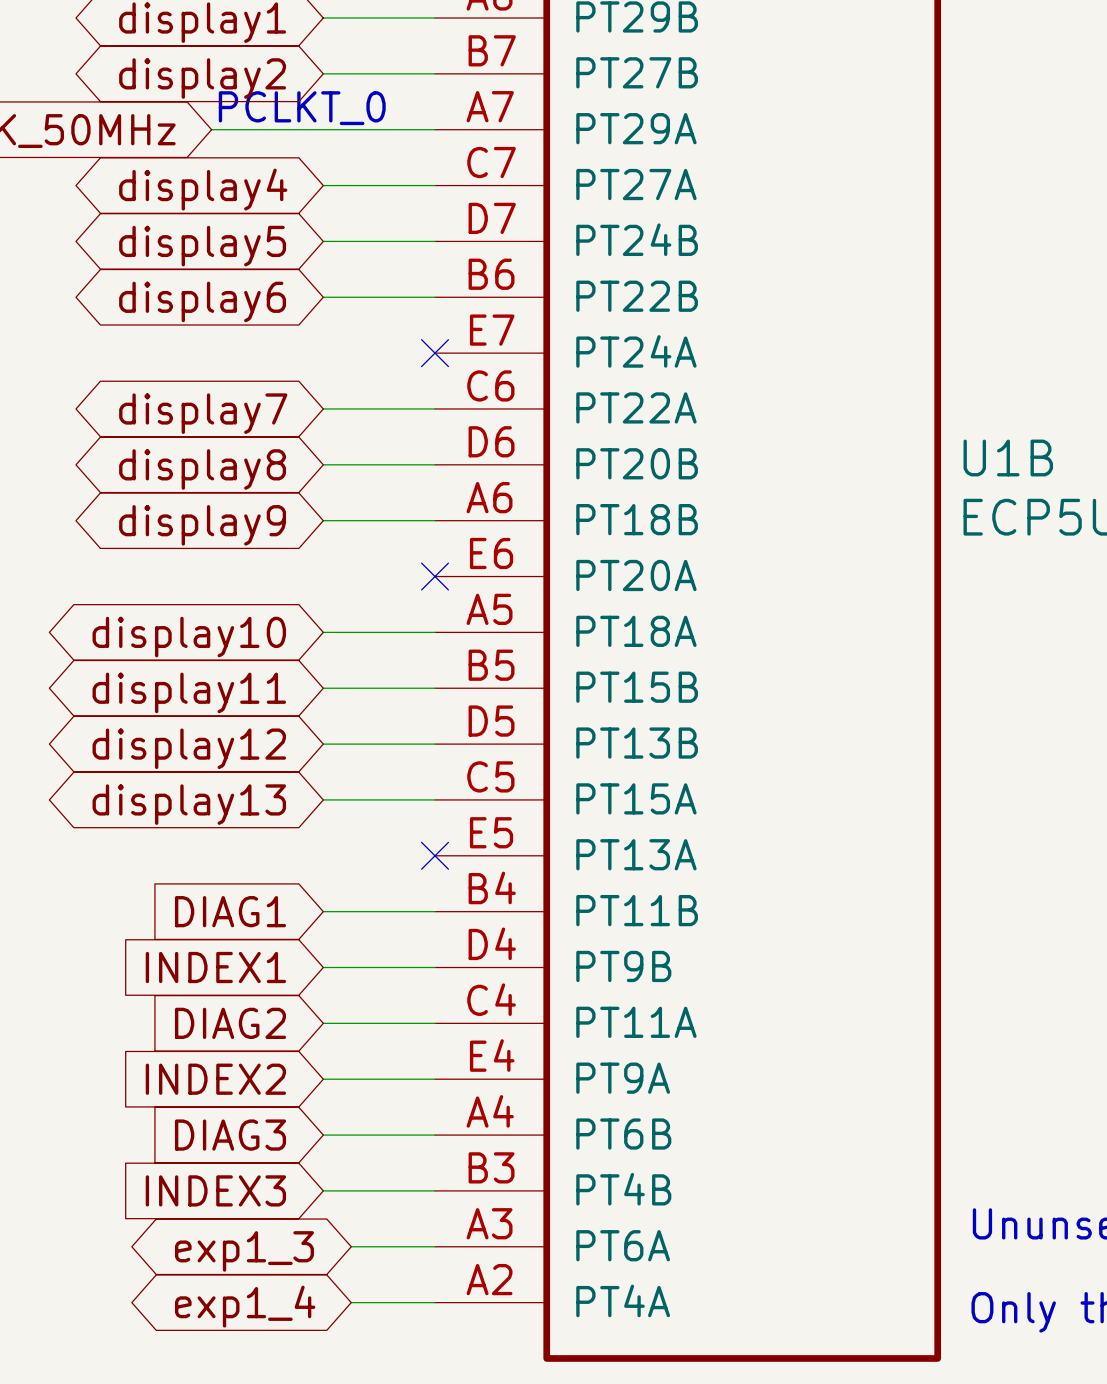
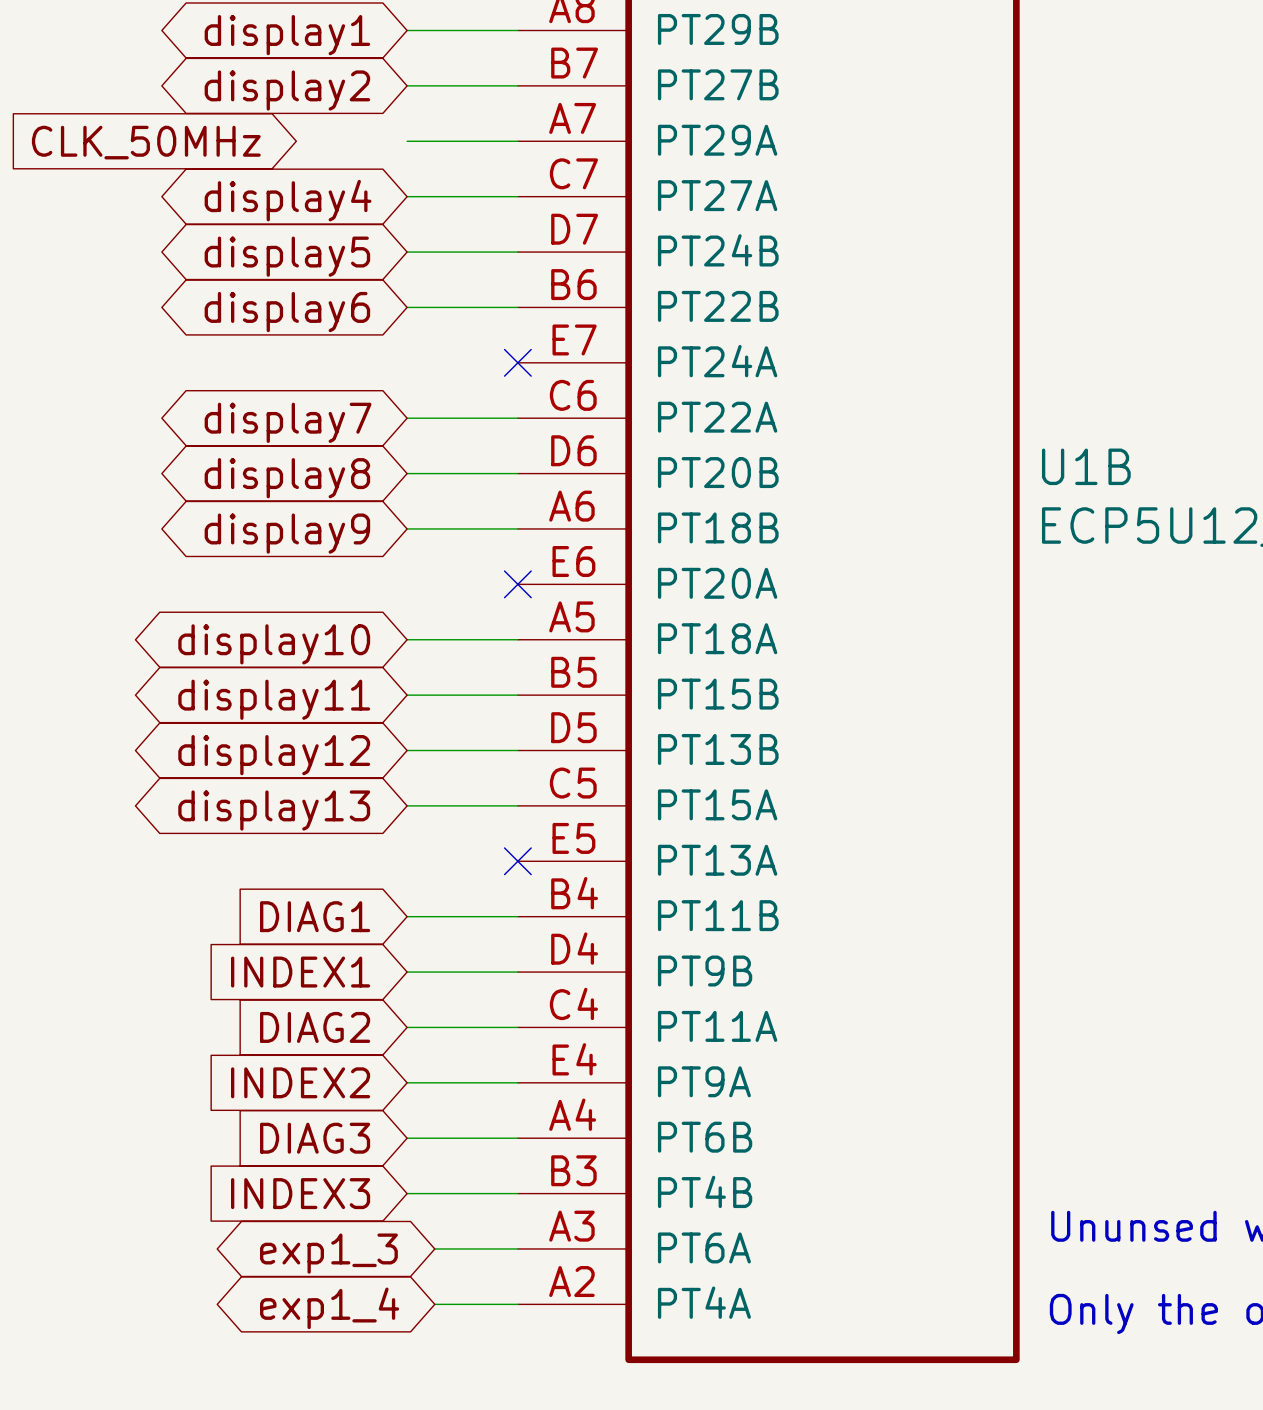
text: PCLKT_0 (302, 108) -> none
wire: (211, 129) (323, 129) -> none

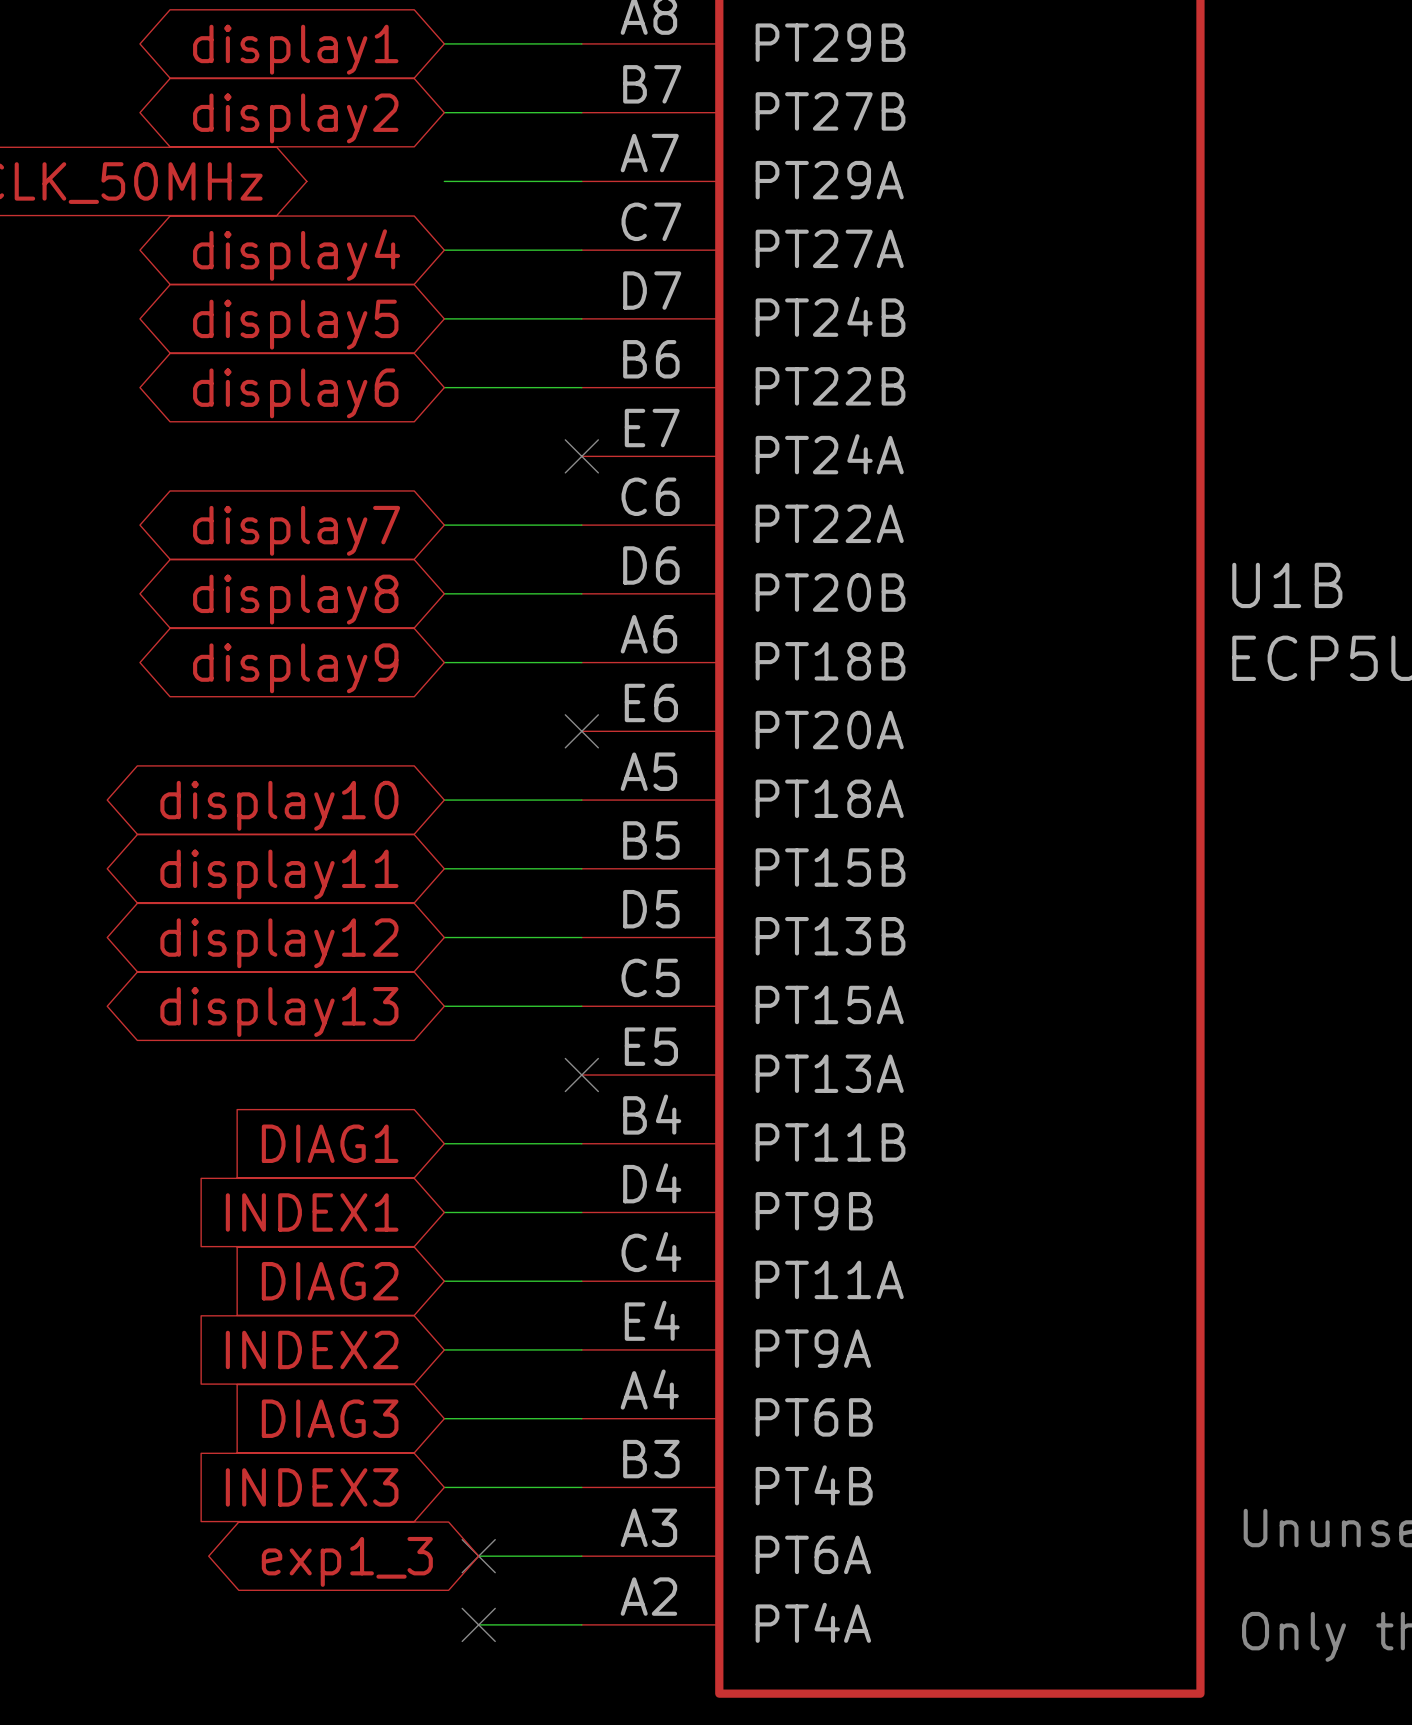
no-connect mark: none -> (478, 1556)
no-connect mark: none -> (478, 1624)
global label: exp1_4 (329, 1308) -> none

